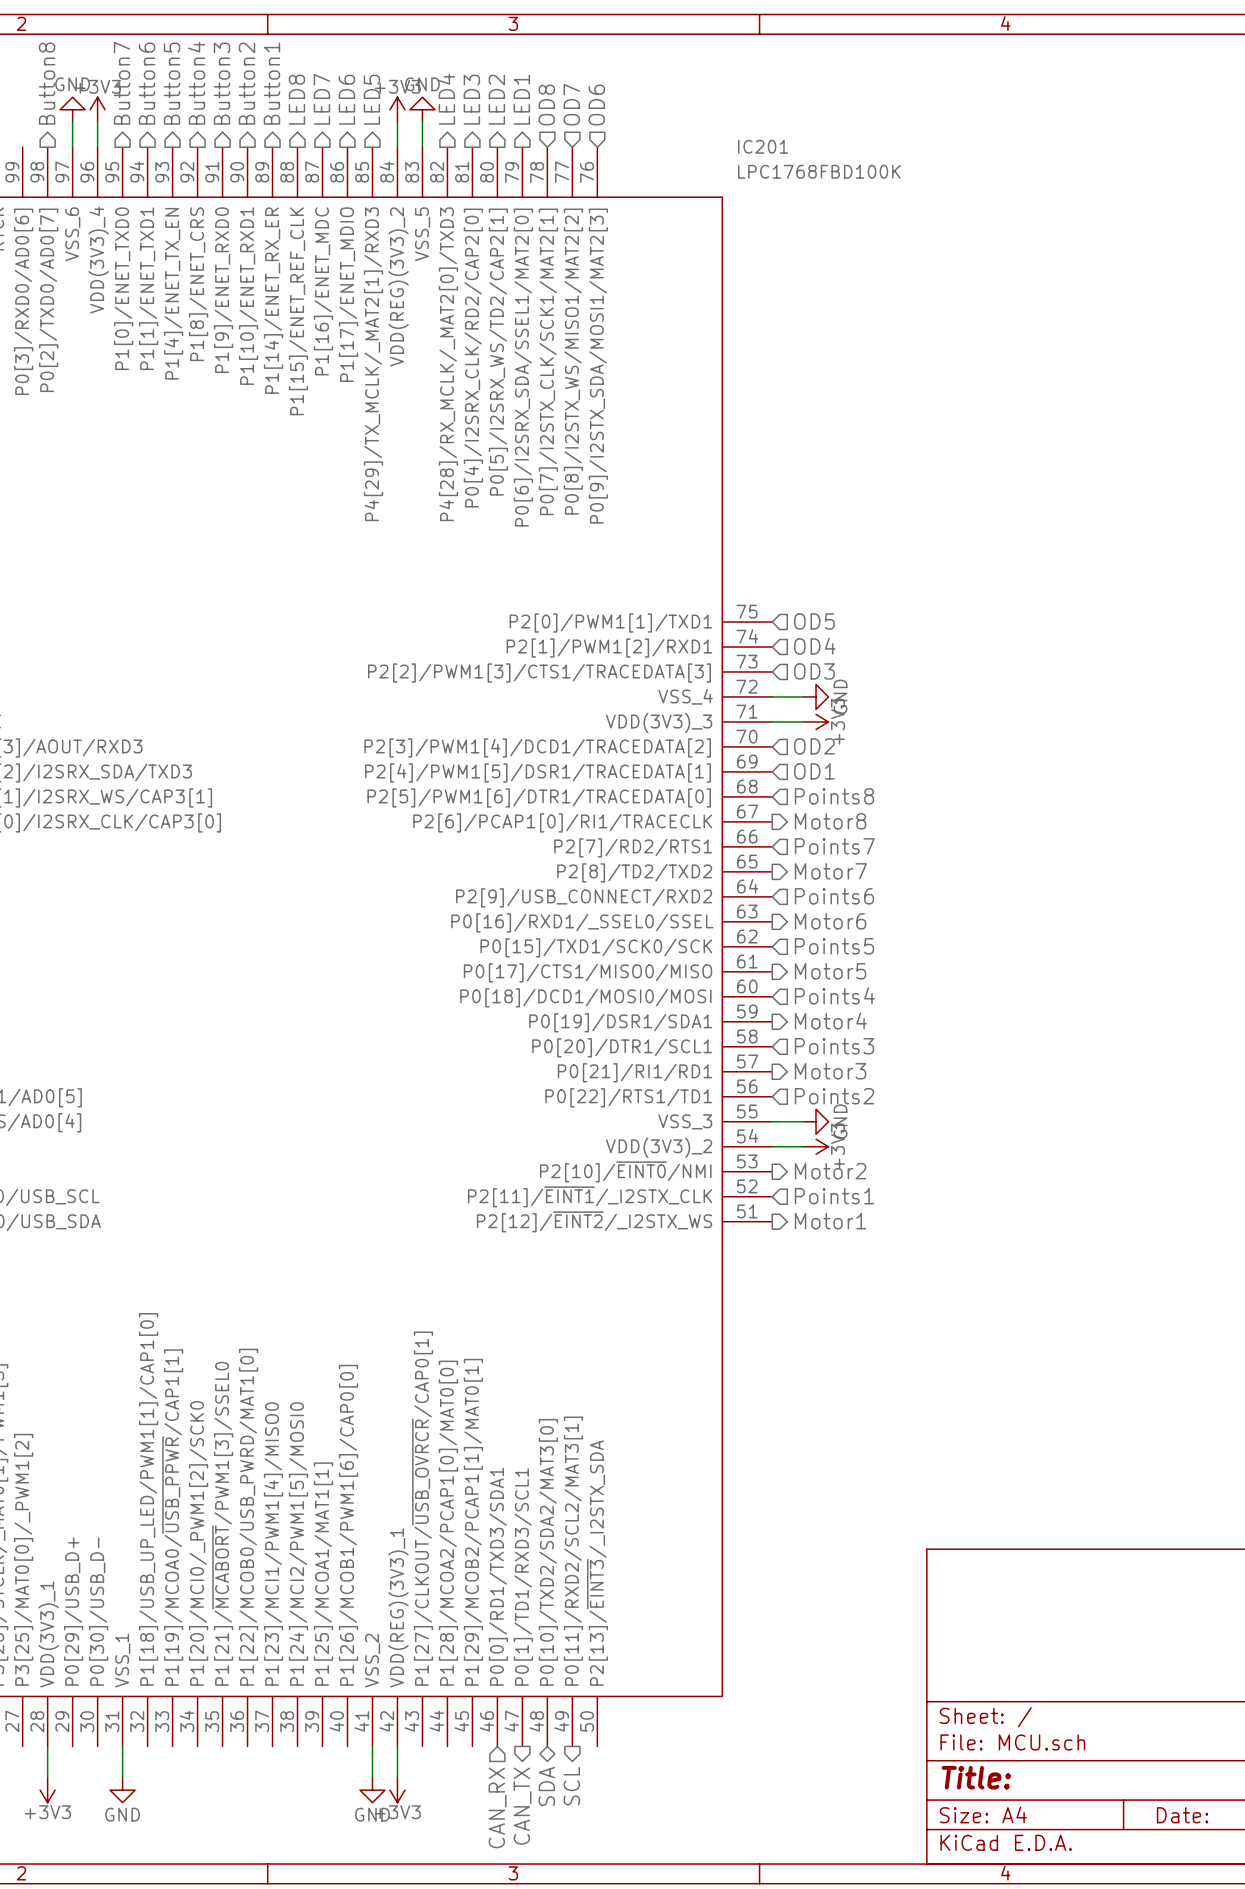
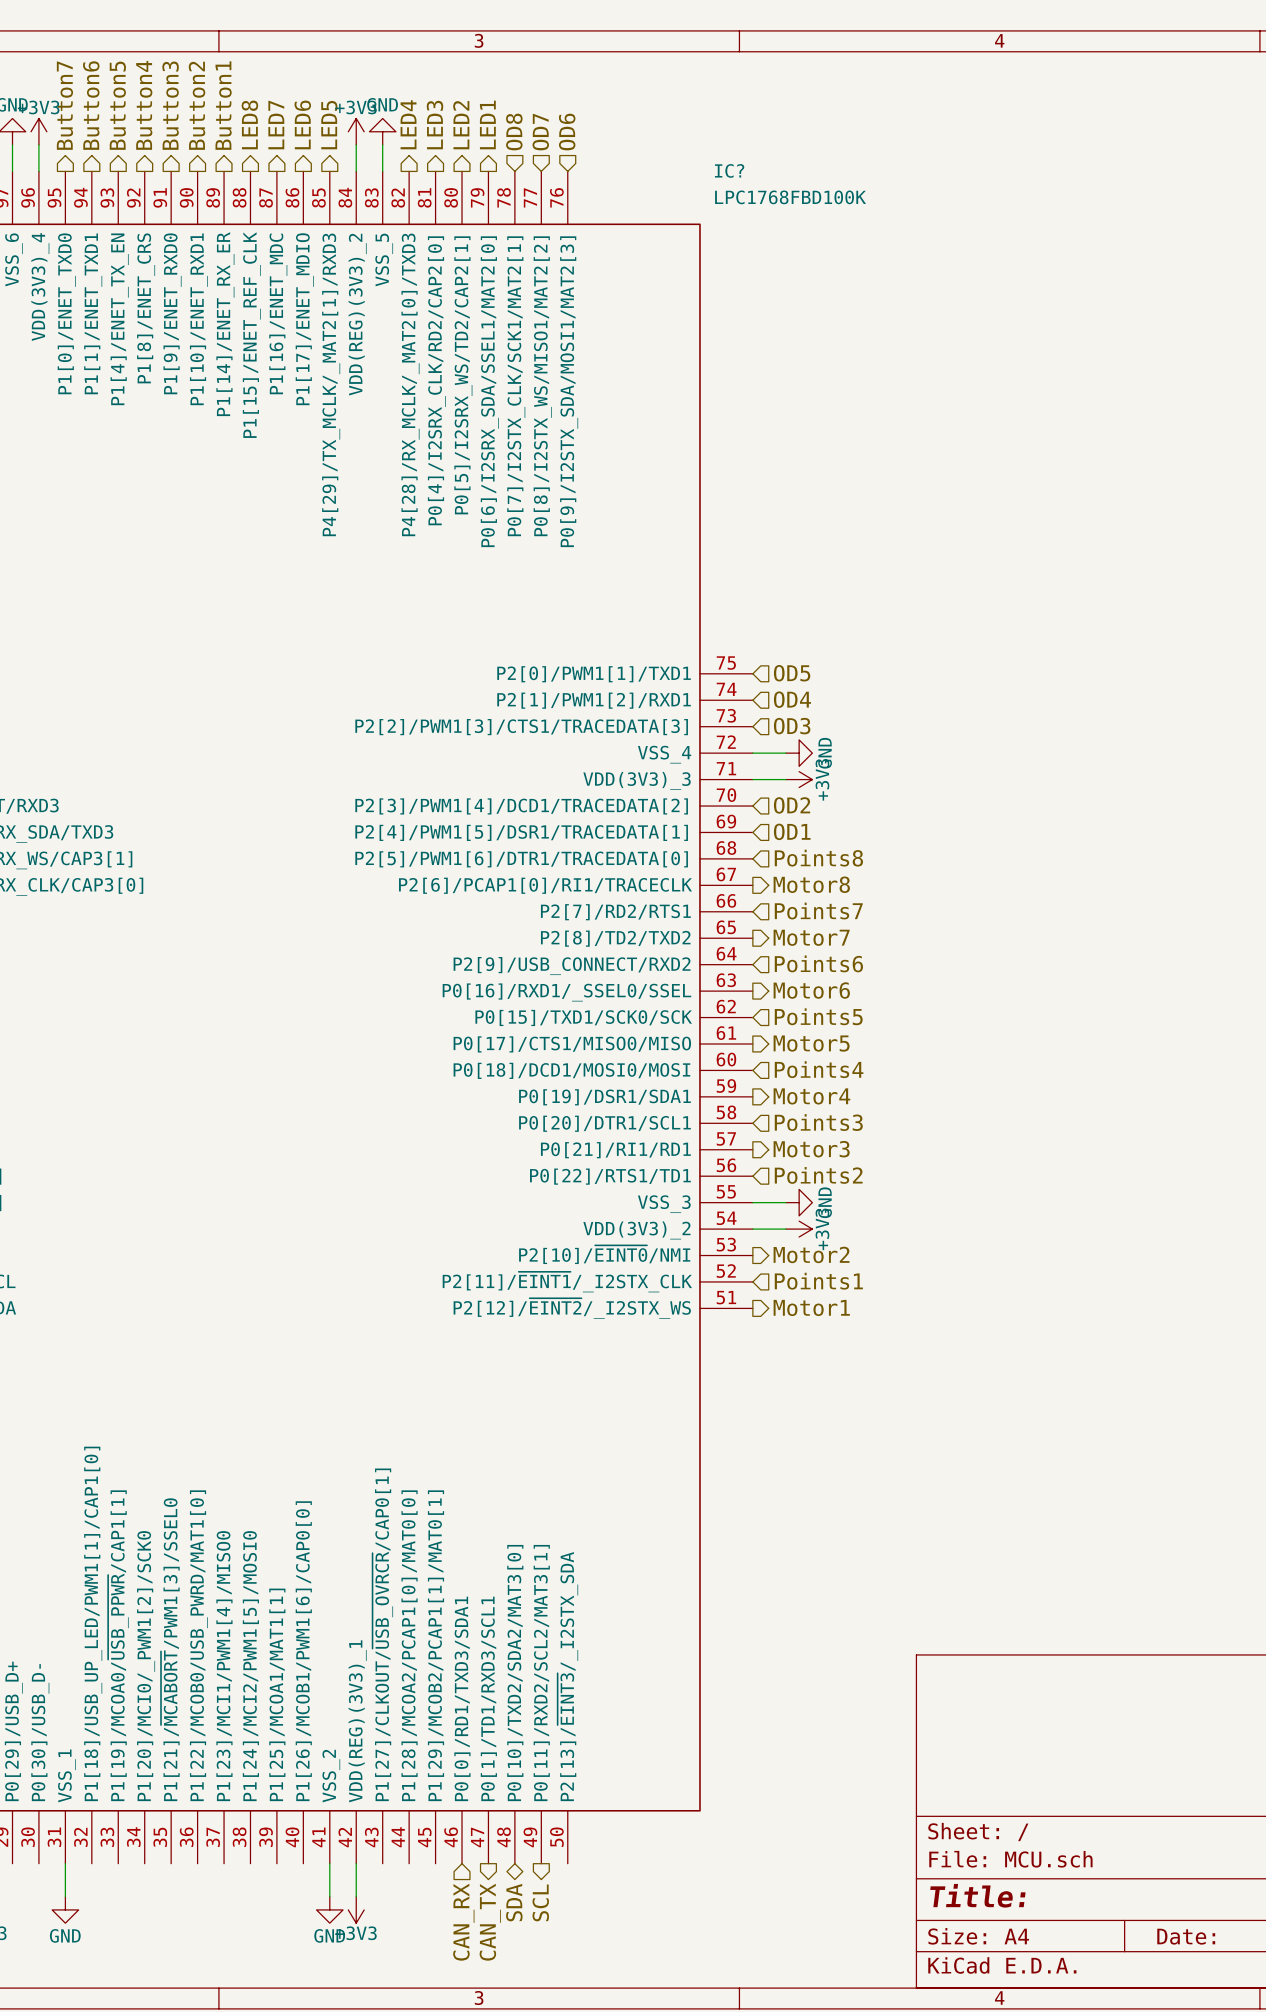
IC201 name: IC201 (763, 146) -> IC? (729, 170)

